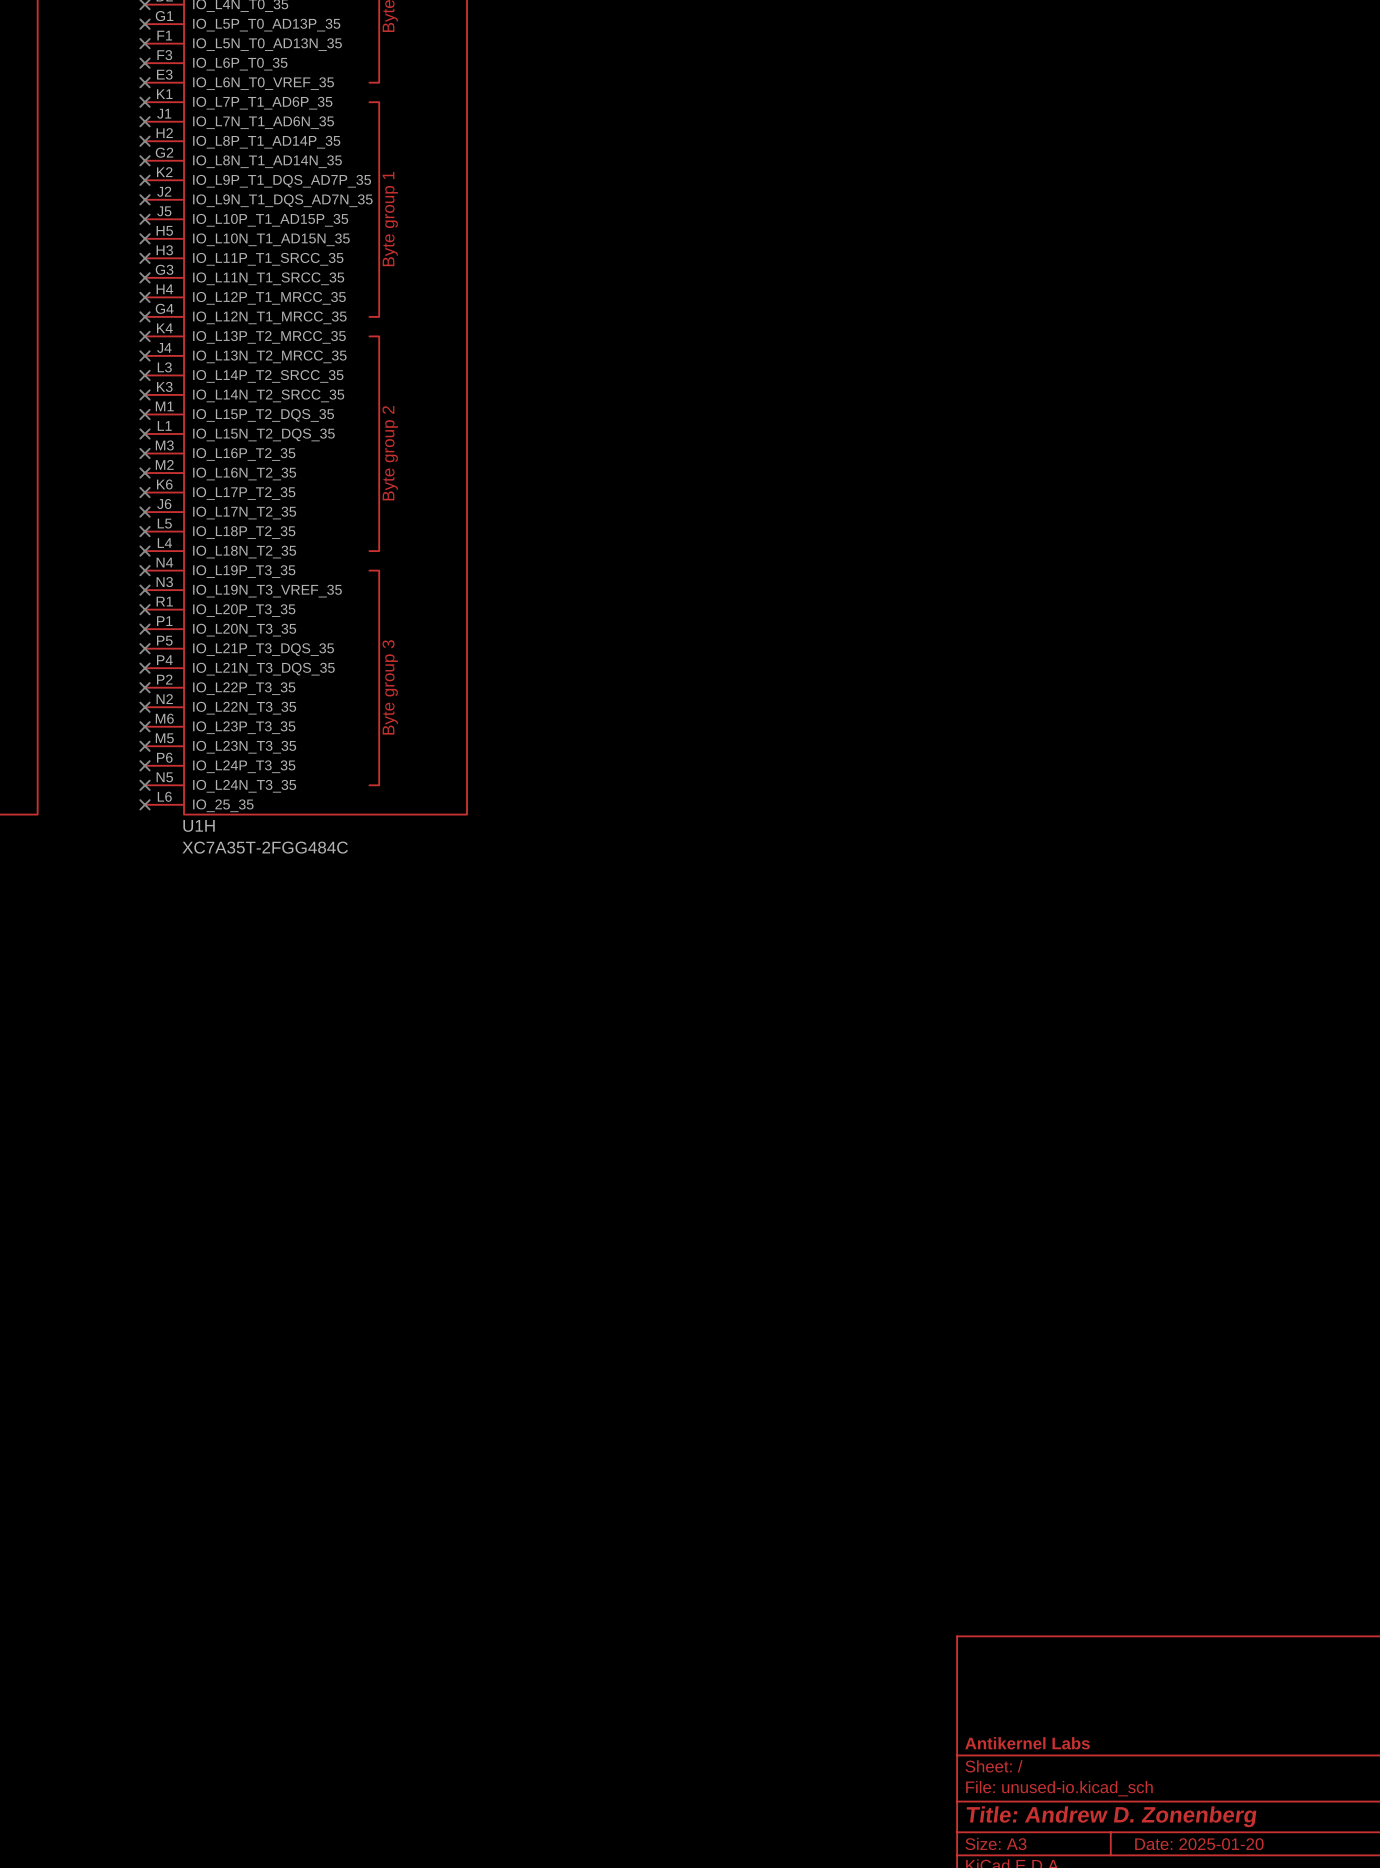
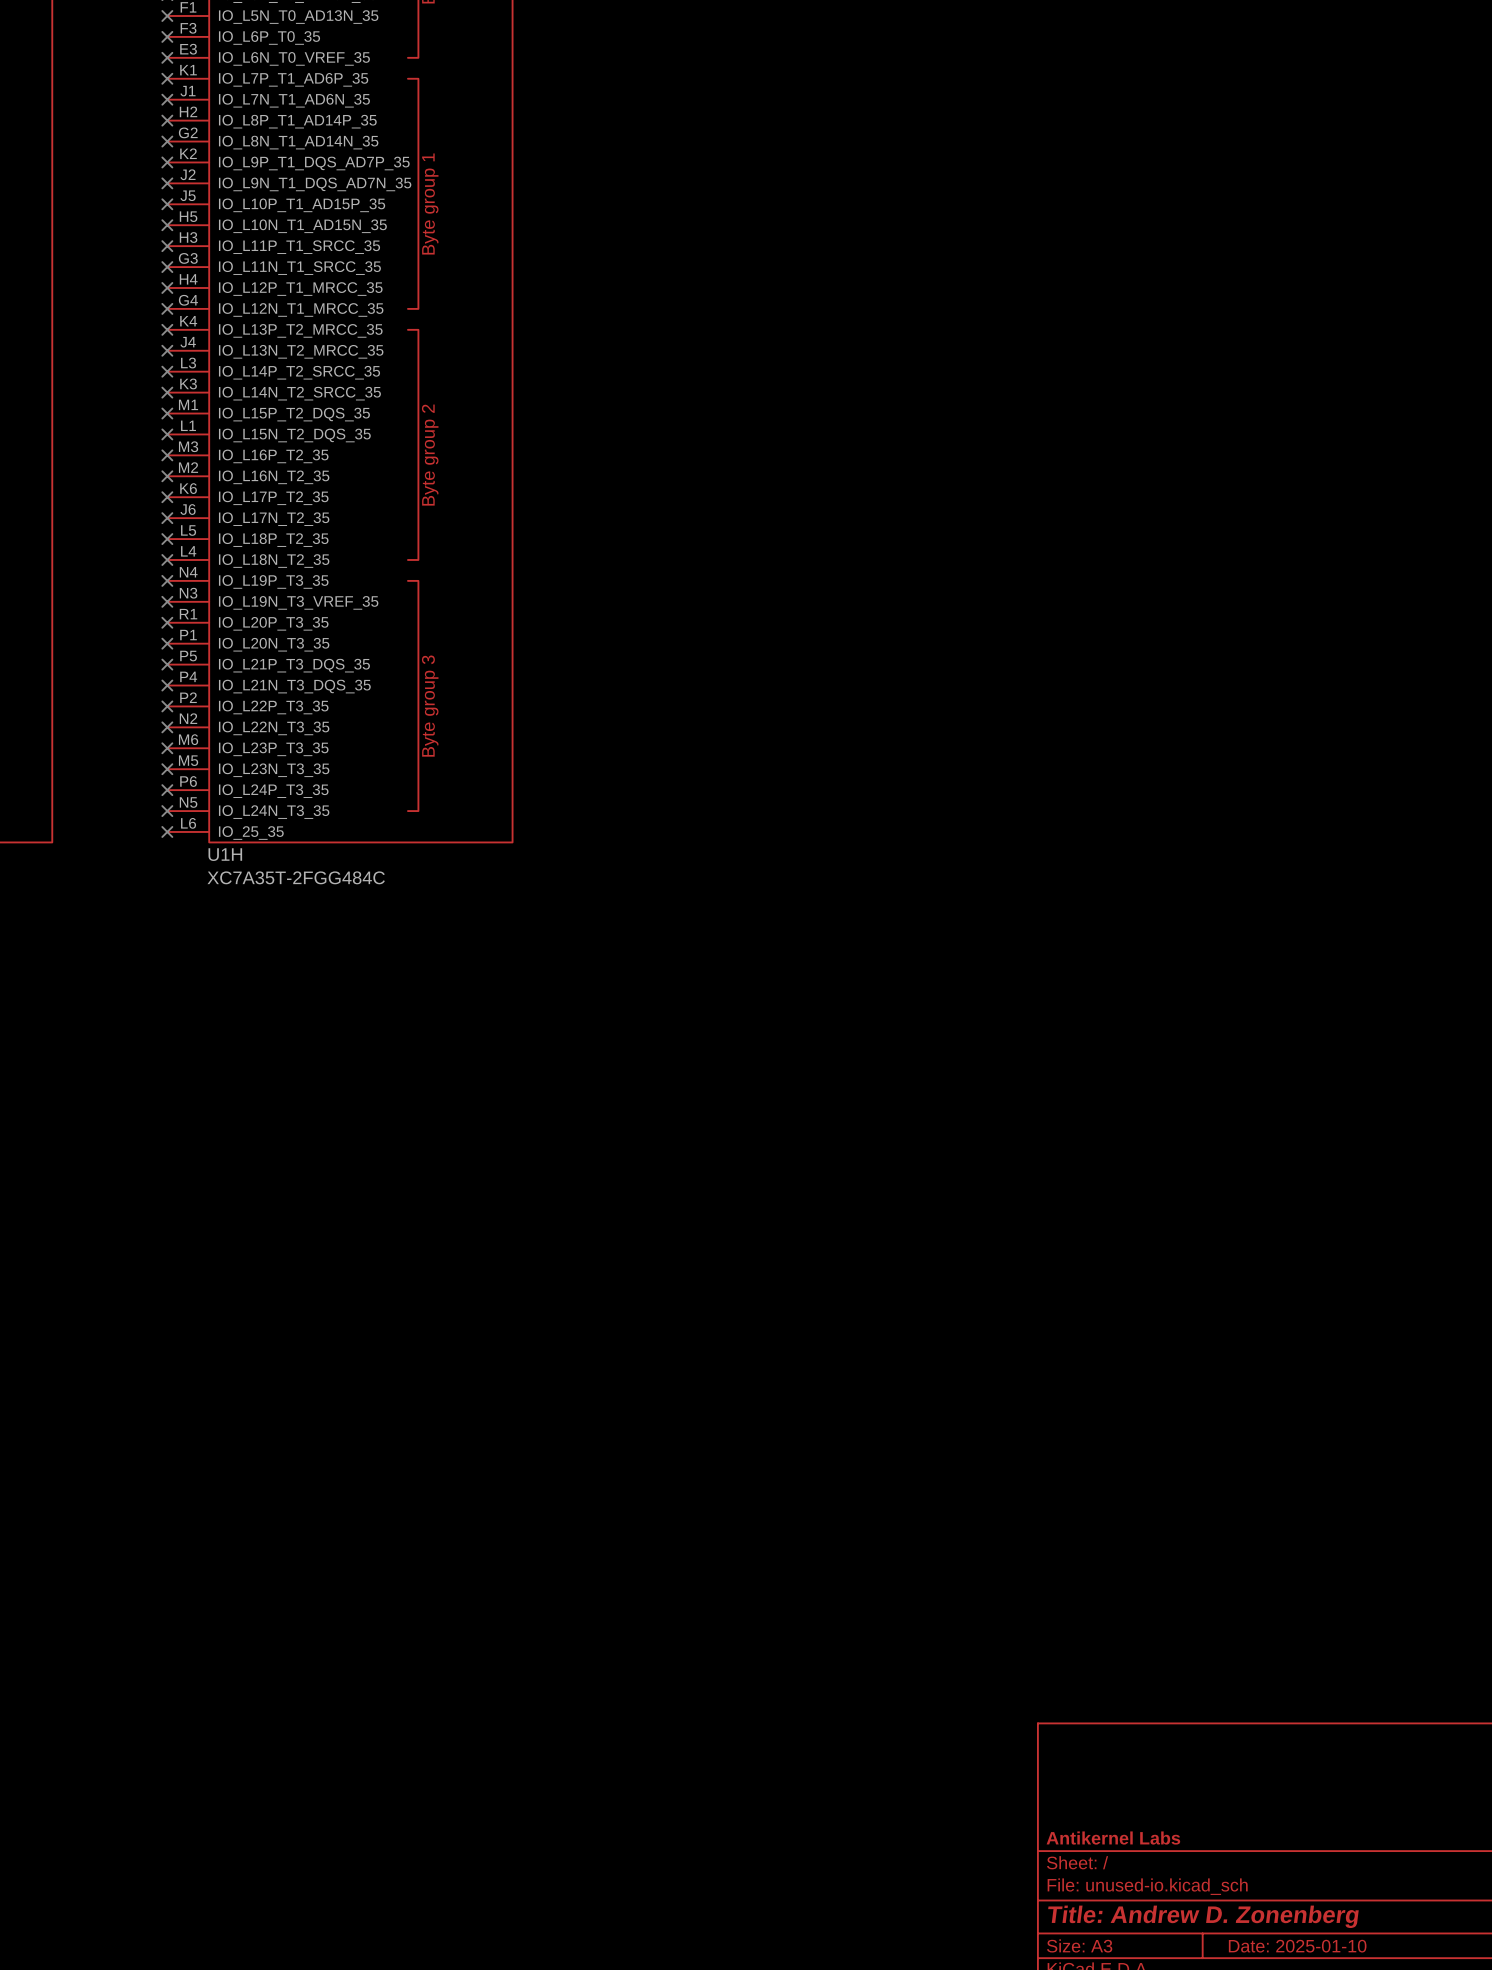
title block: Date: 2025-01-20 (1199, 1844) -> Date: 2025-01-10 (1297, 1946)

